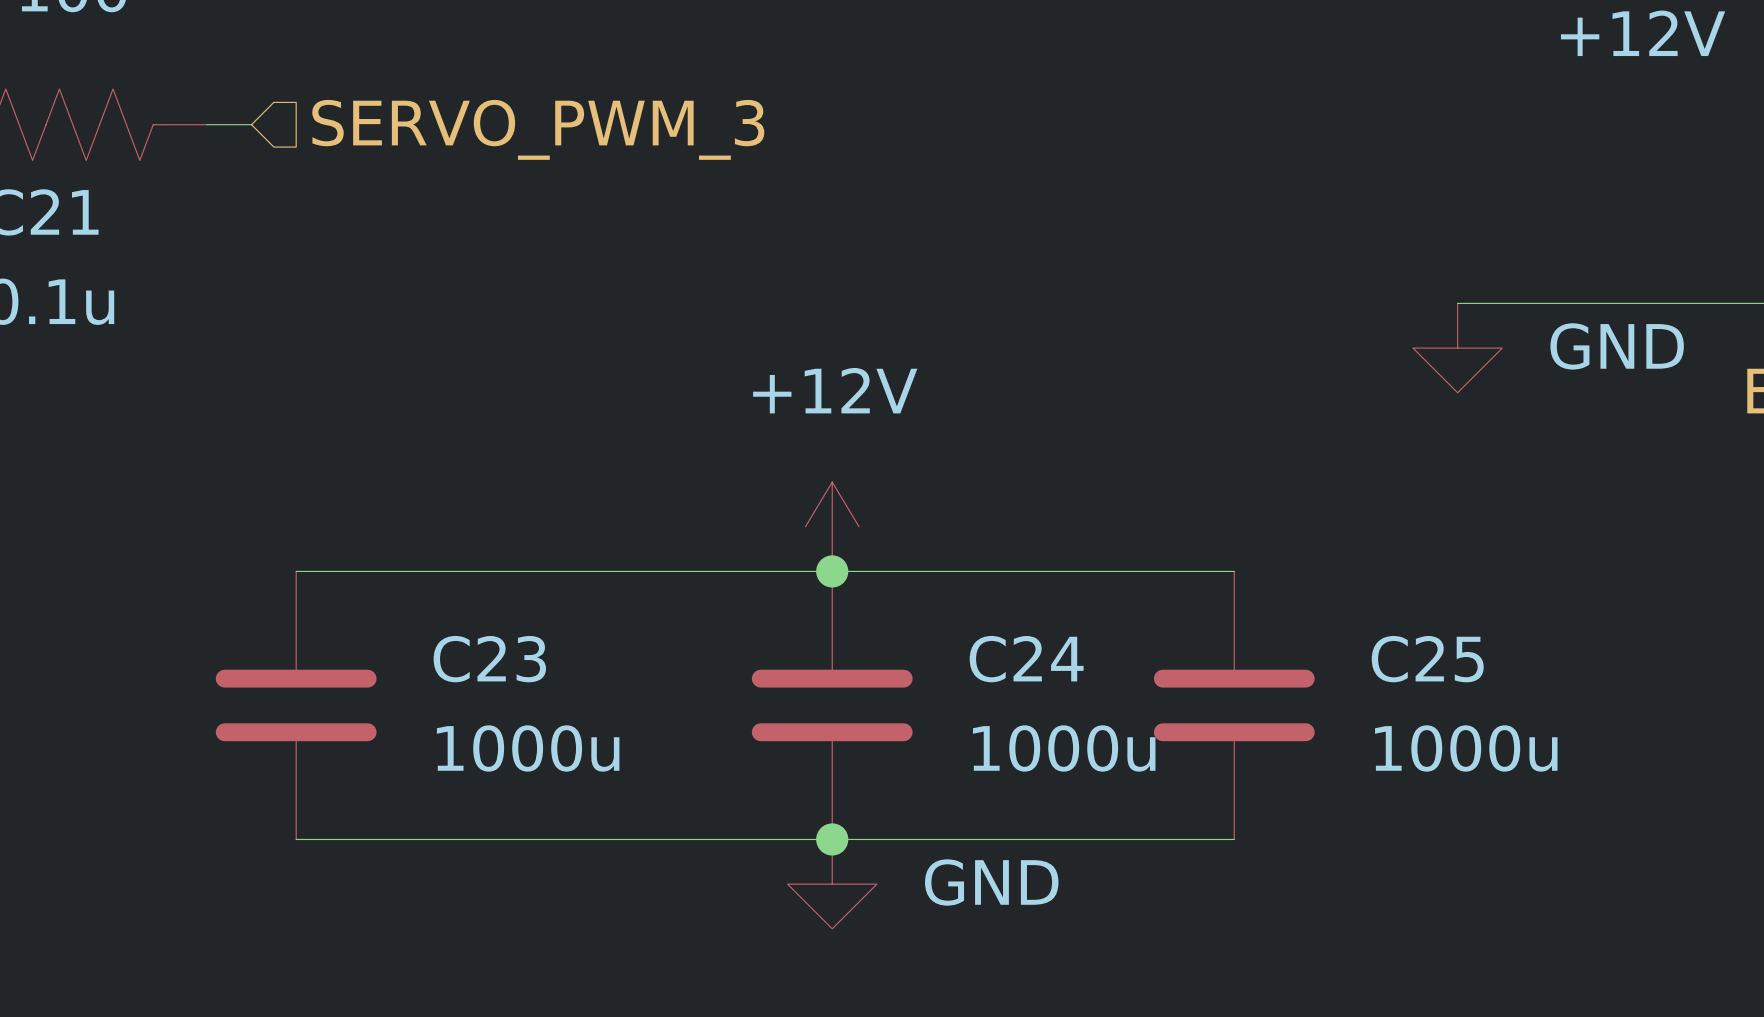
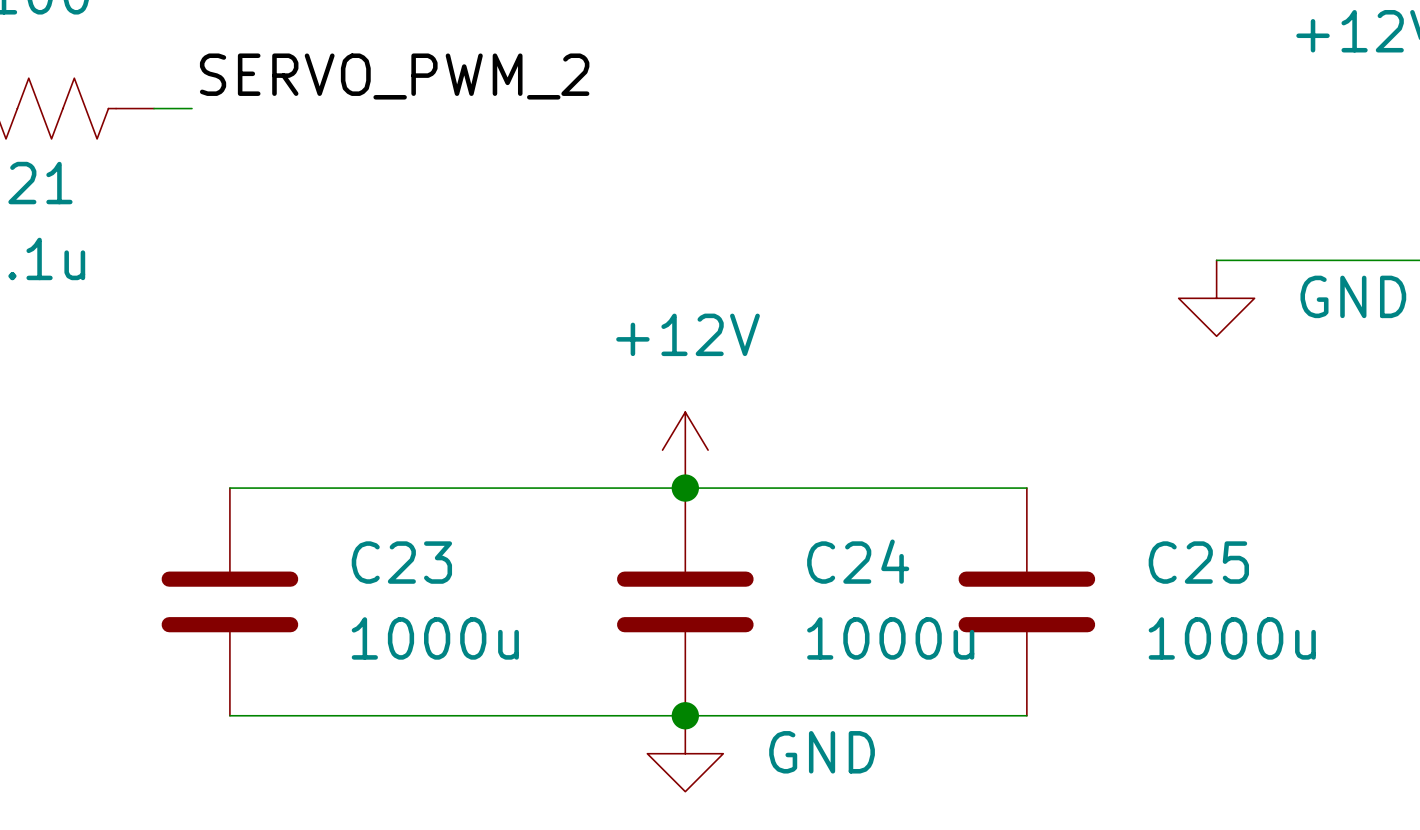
label: none -> SERVO_PWM_2 (394, 76)
hierarchical label: SERVO_PWM_3 (538, 129) -> none

